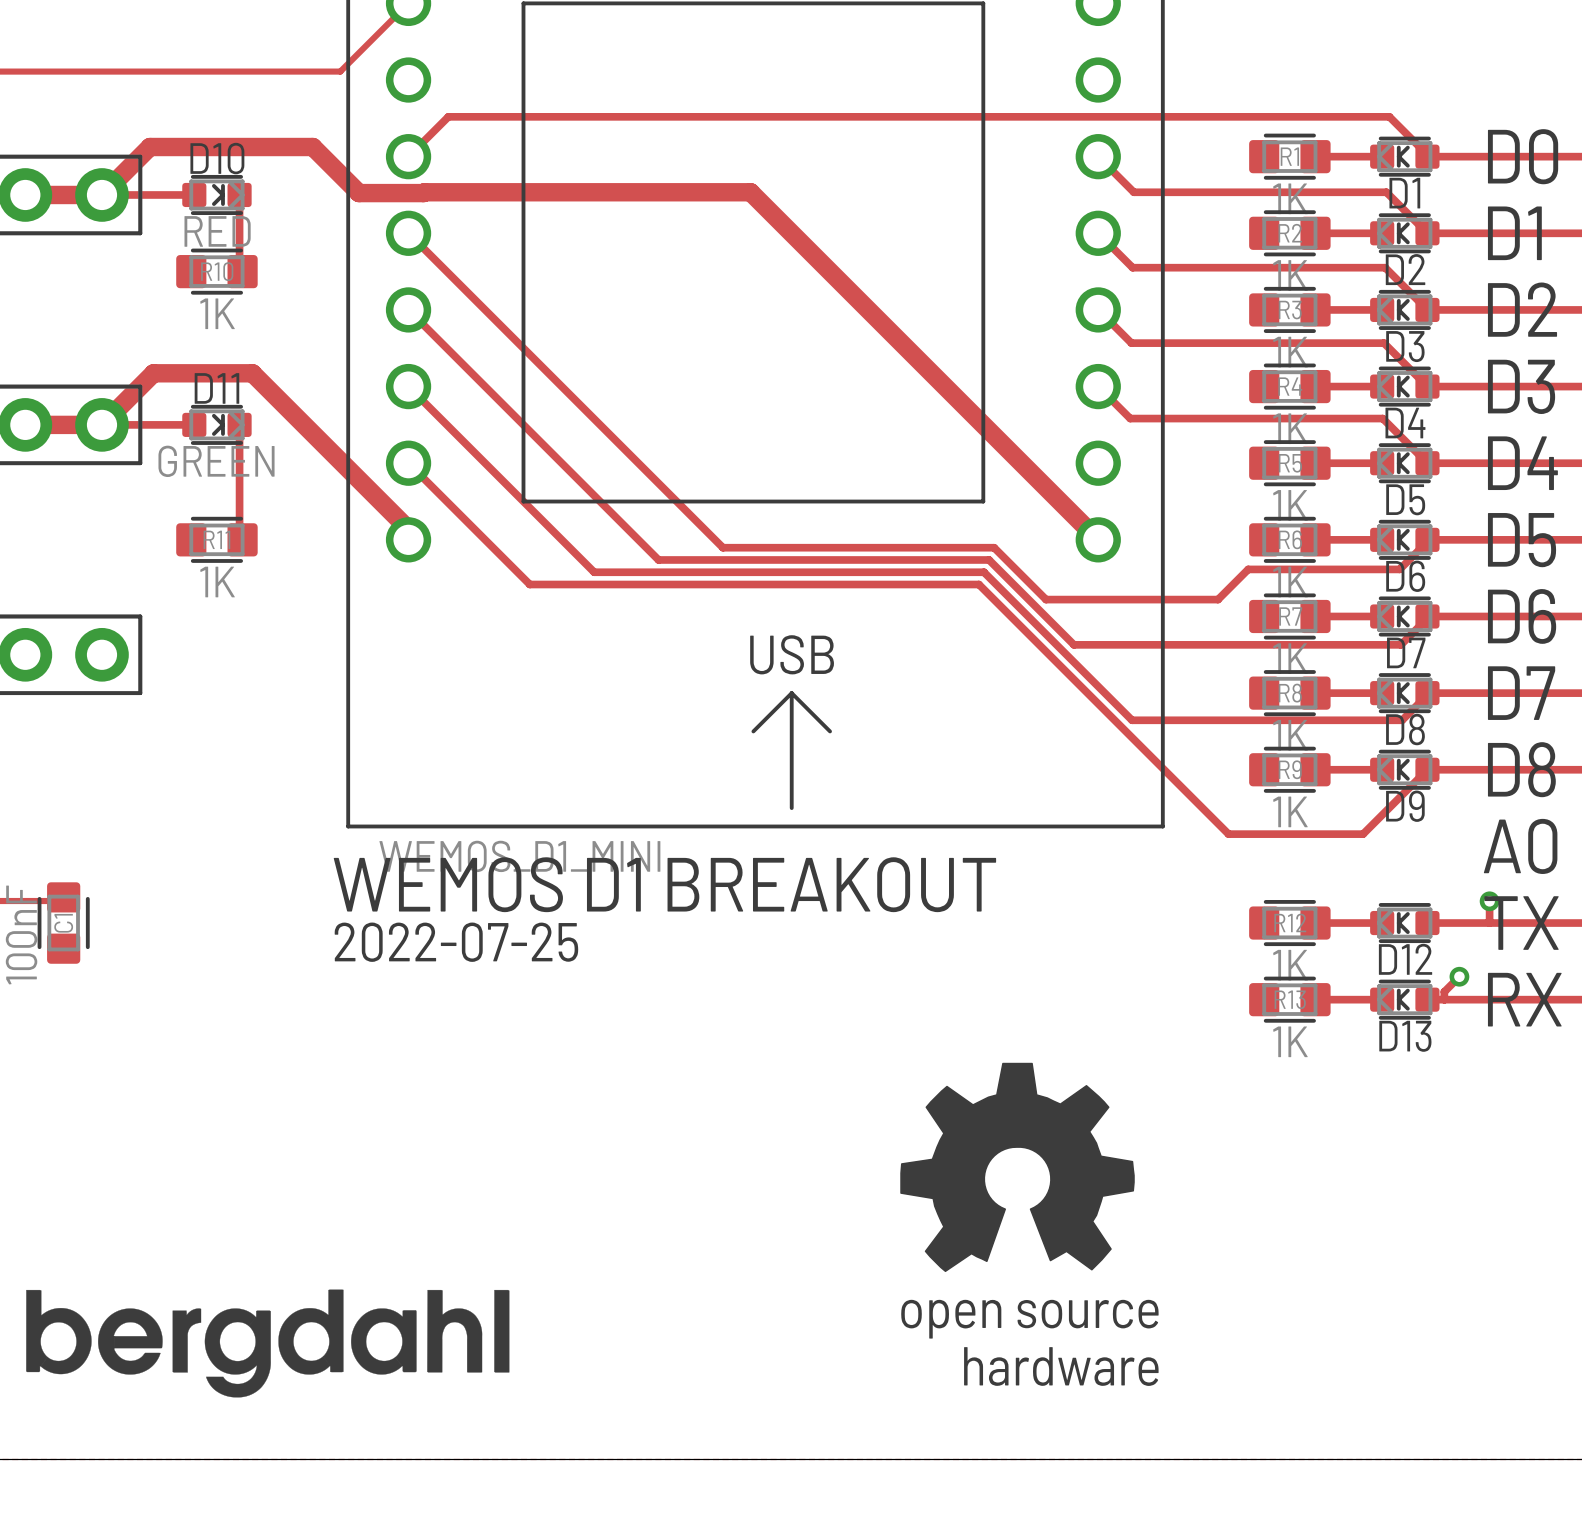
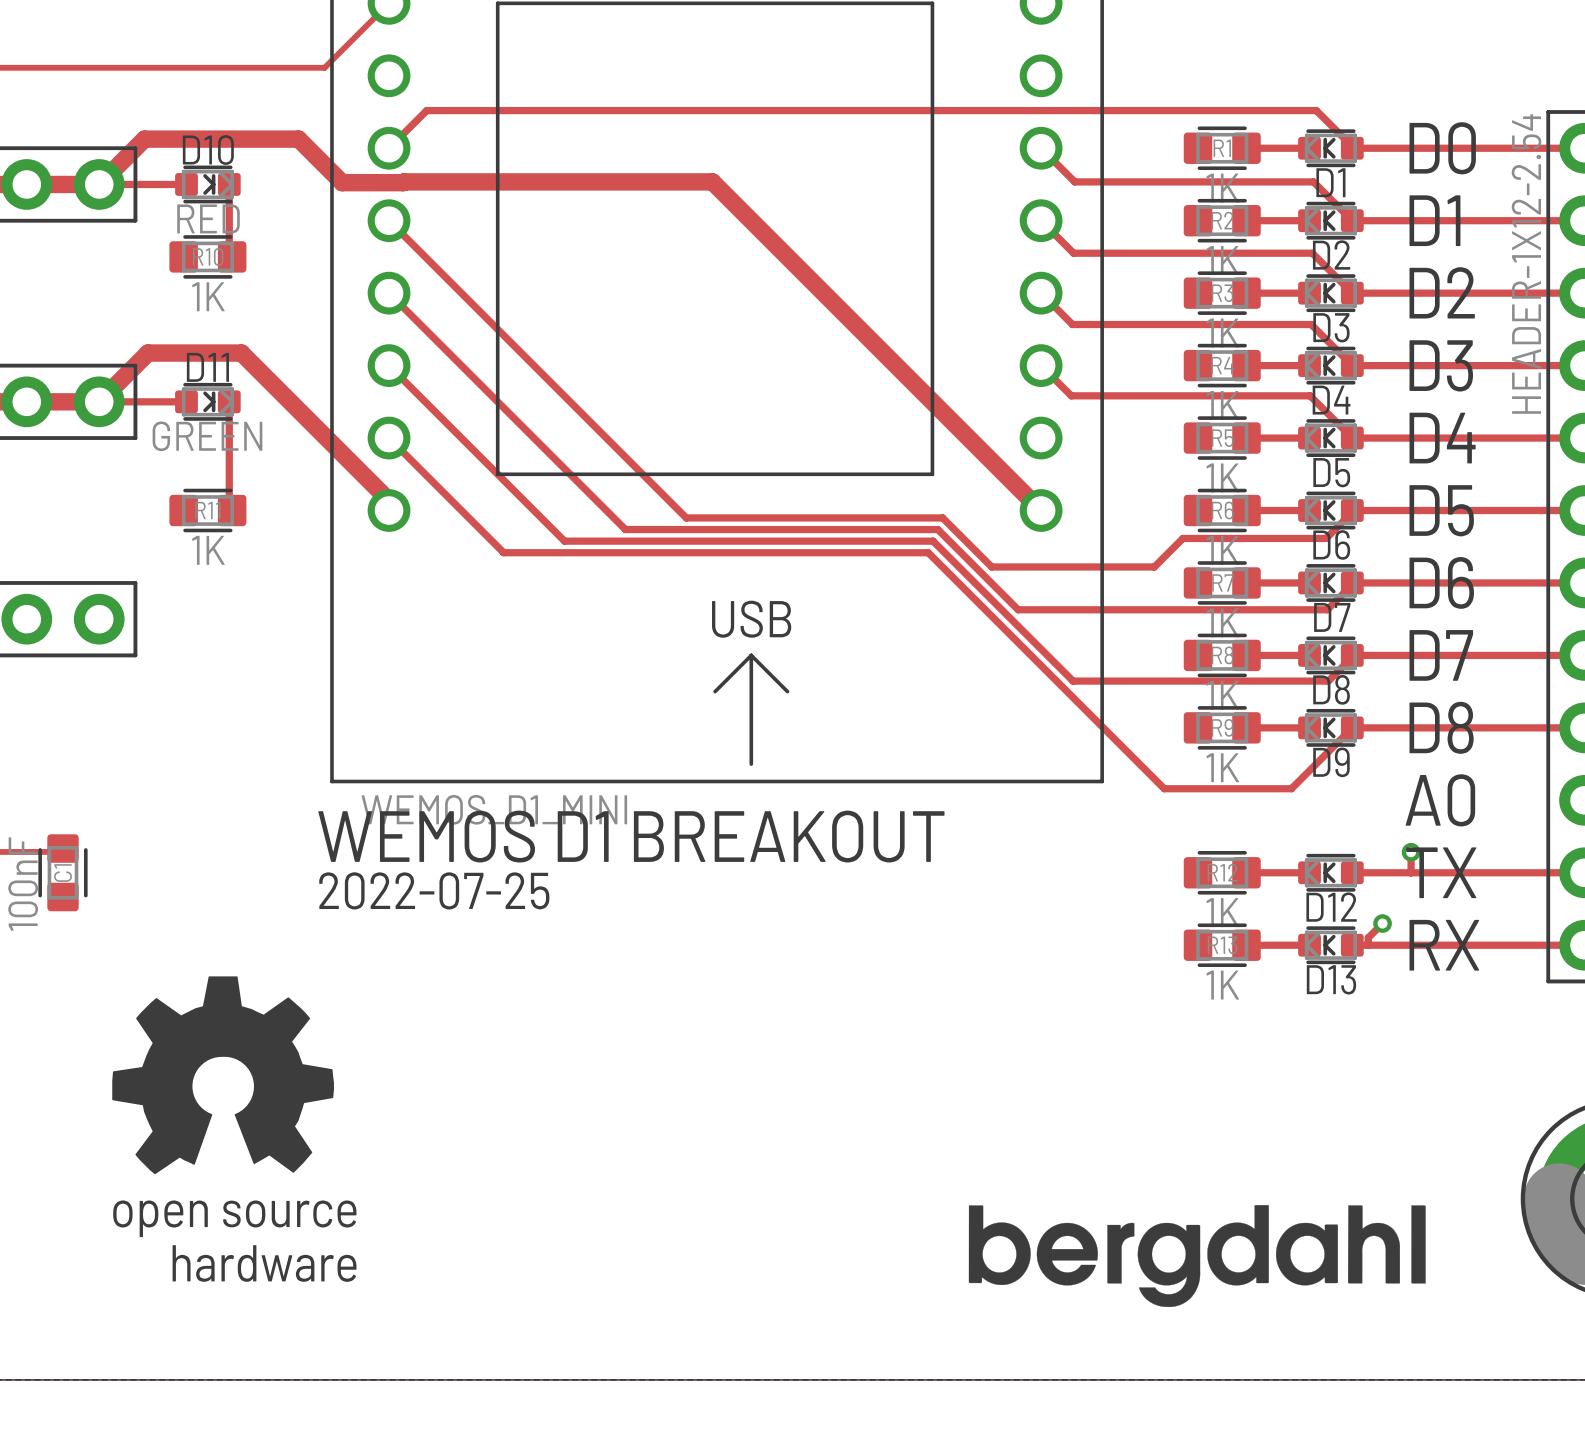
drawing: none -> [112, 976, 334, 1175]
drawing: [900, 1062, 1135, 1273] -> none
drawing: none -> [968, 1205, 1426, 1308]
drawing: [26, 1289, 510, 1398] -> none

